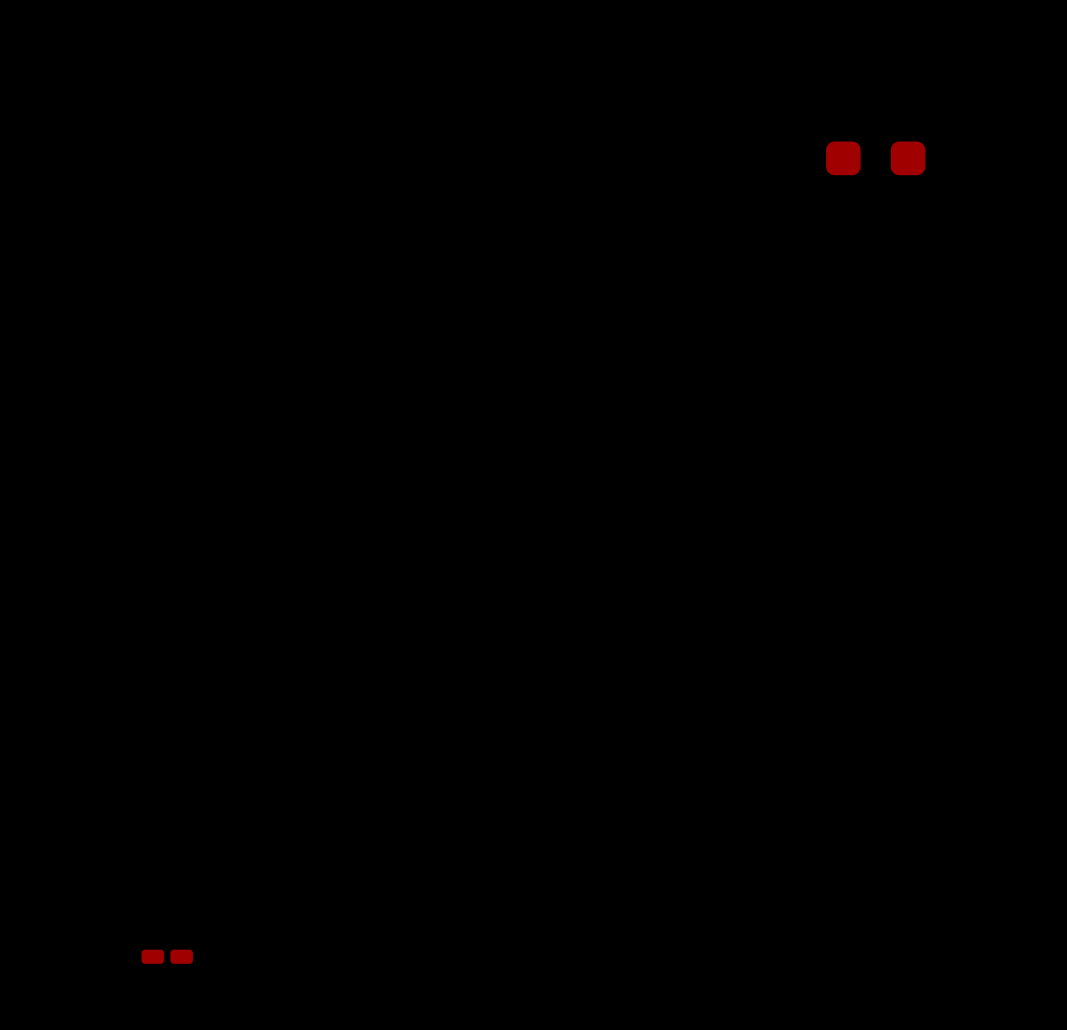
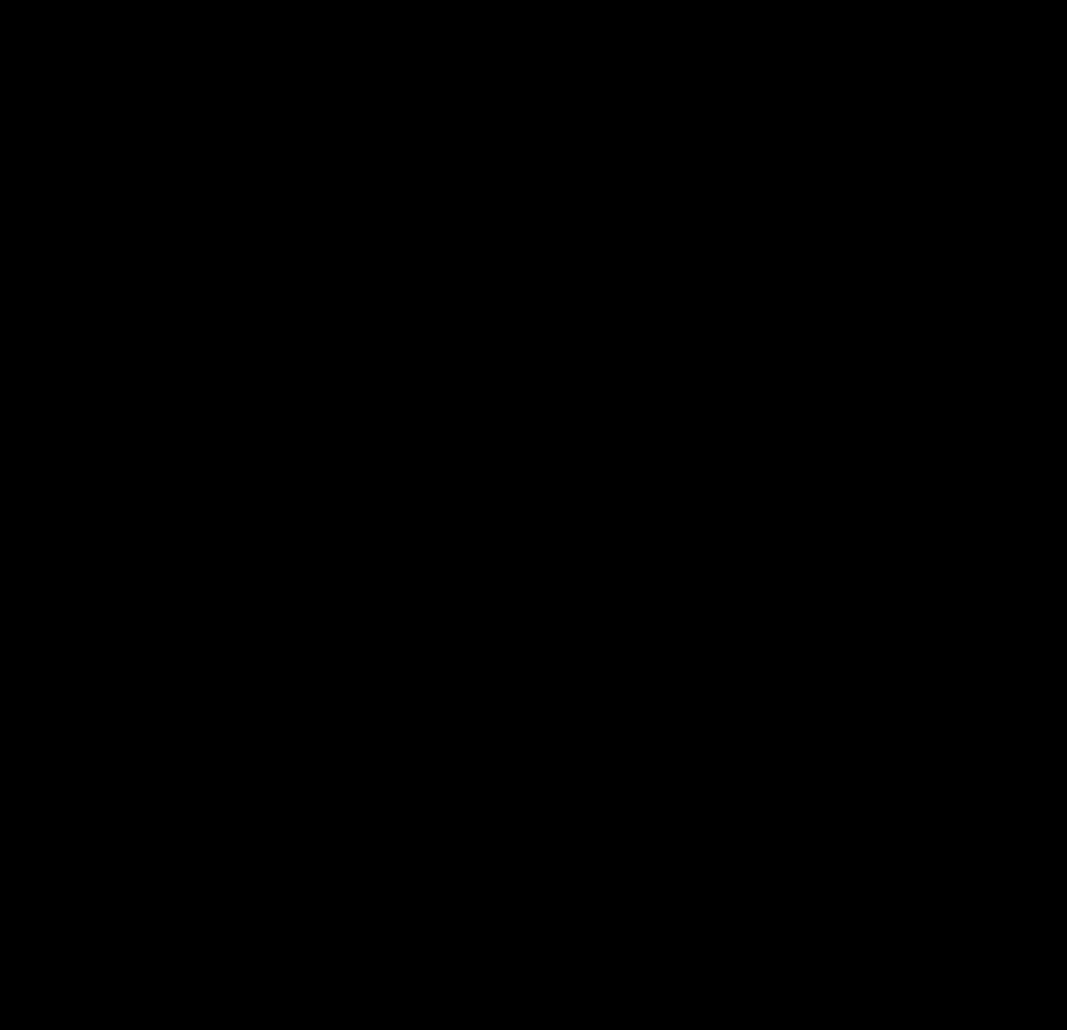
part: (875, 158) -> none
part: (167, 956) -> none

